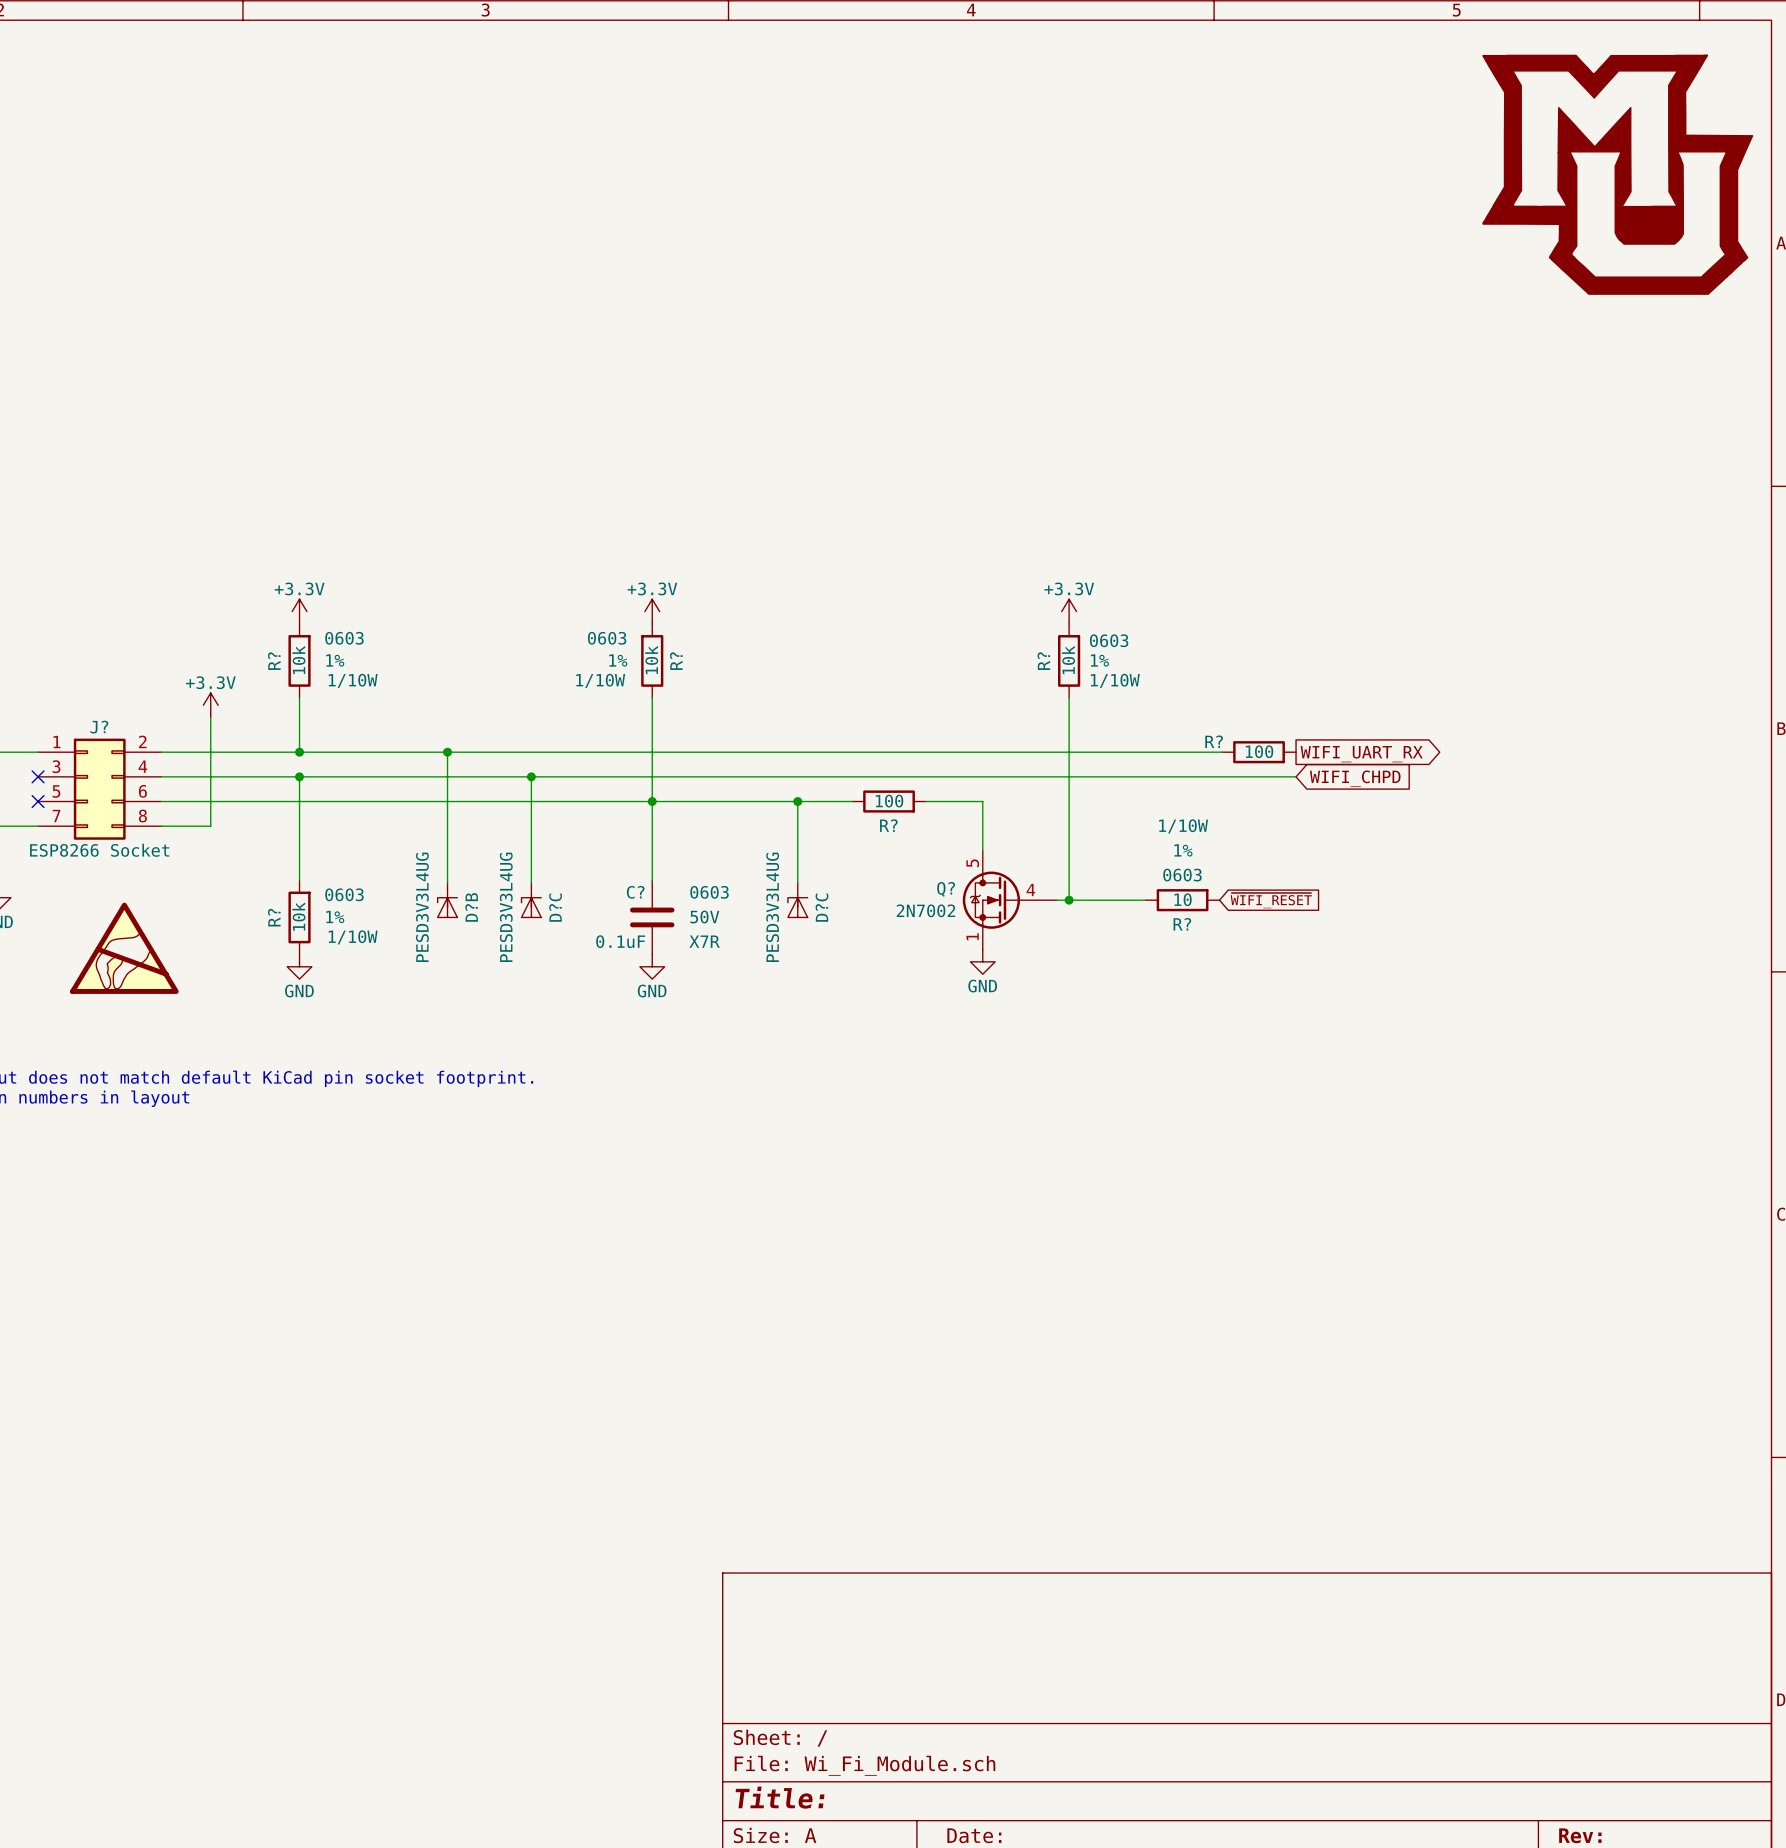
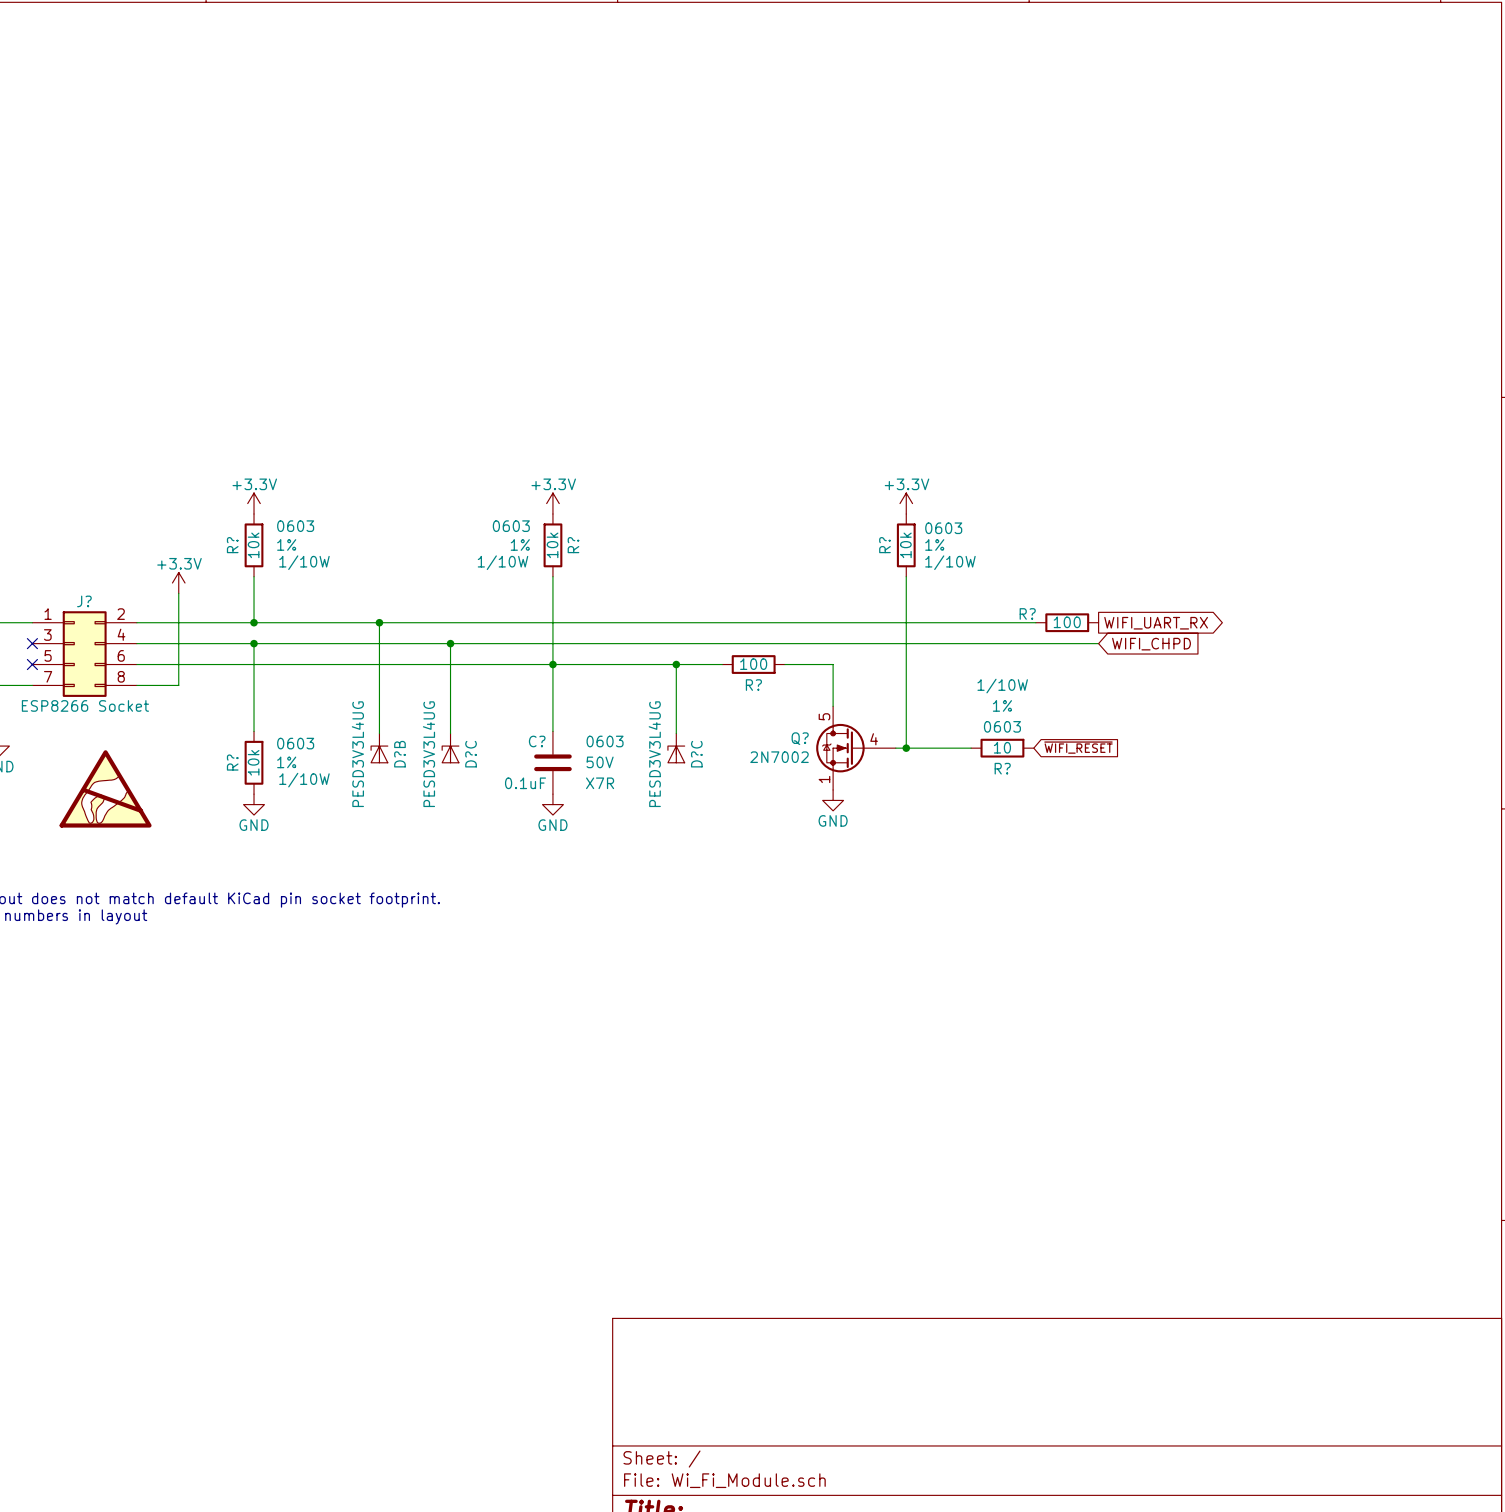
power symbol: (1617, 174) -> none

